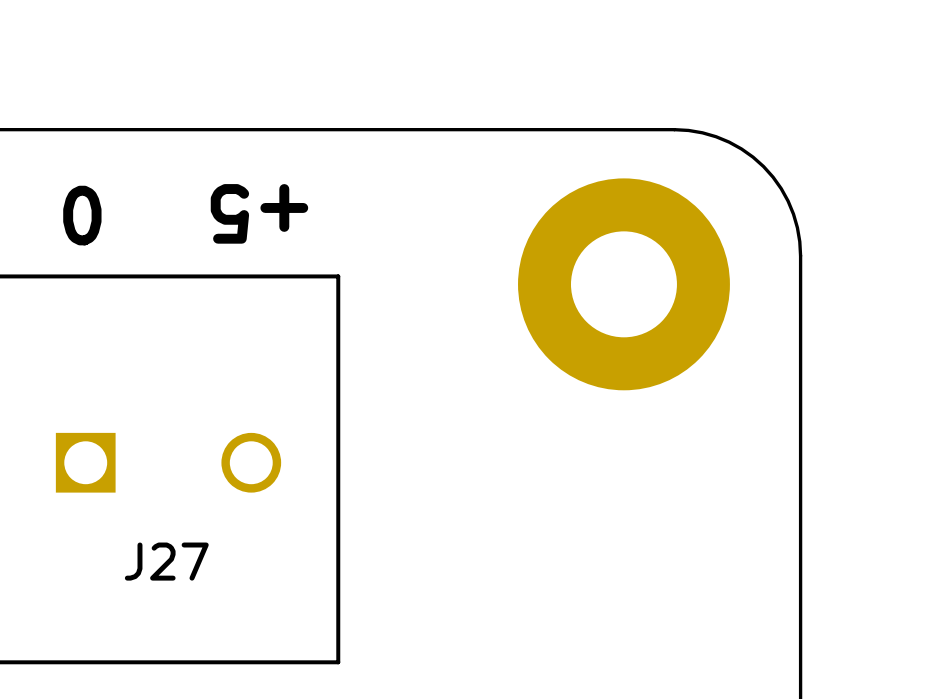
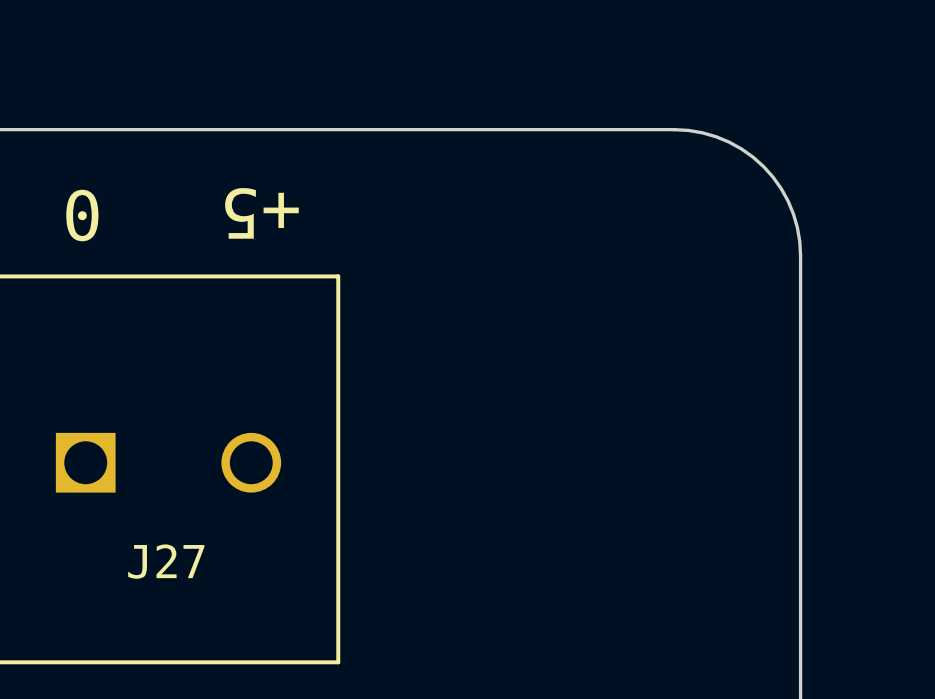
part: (623, 284) -> none

